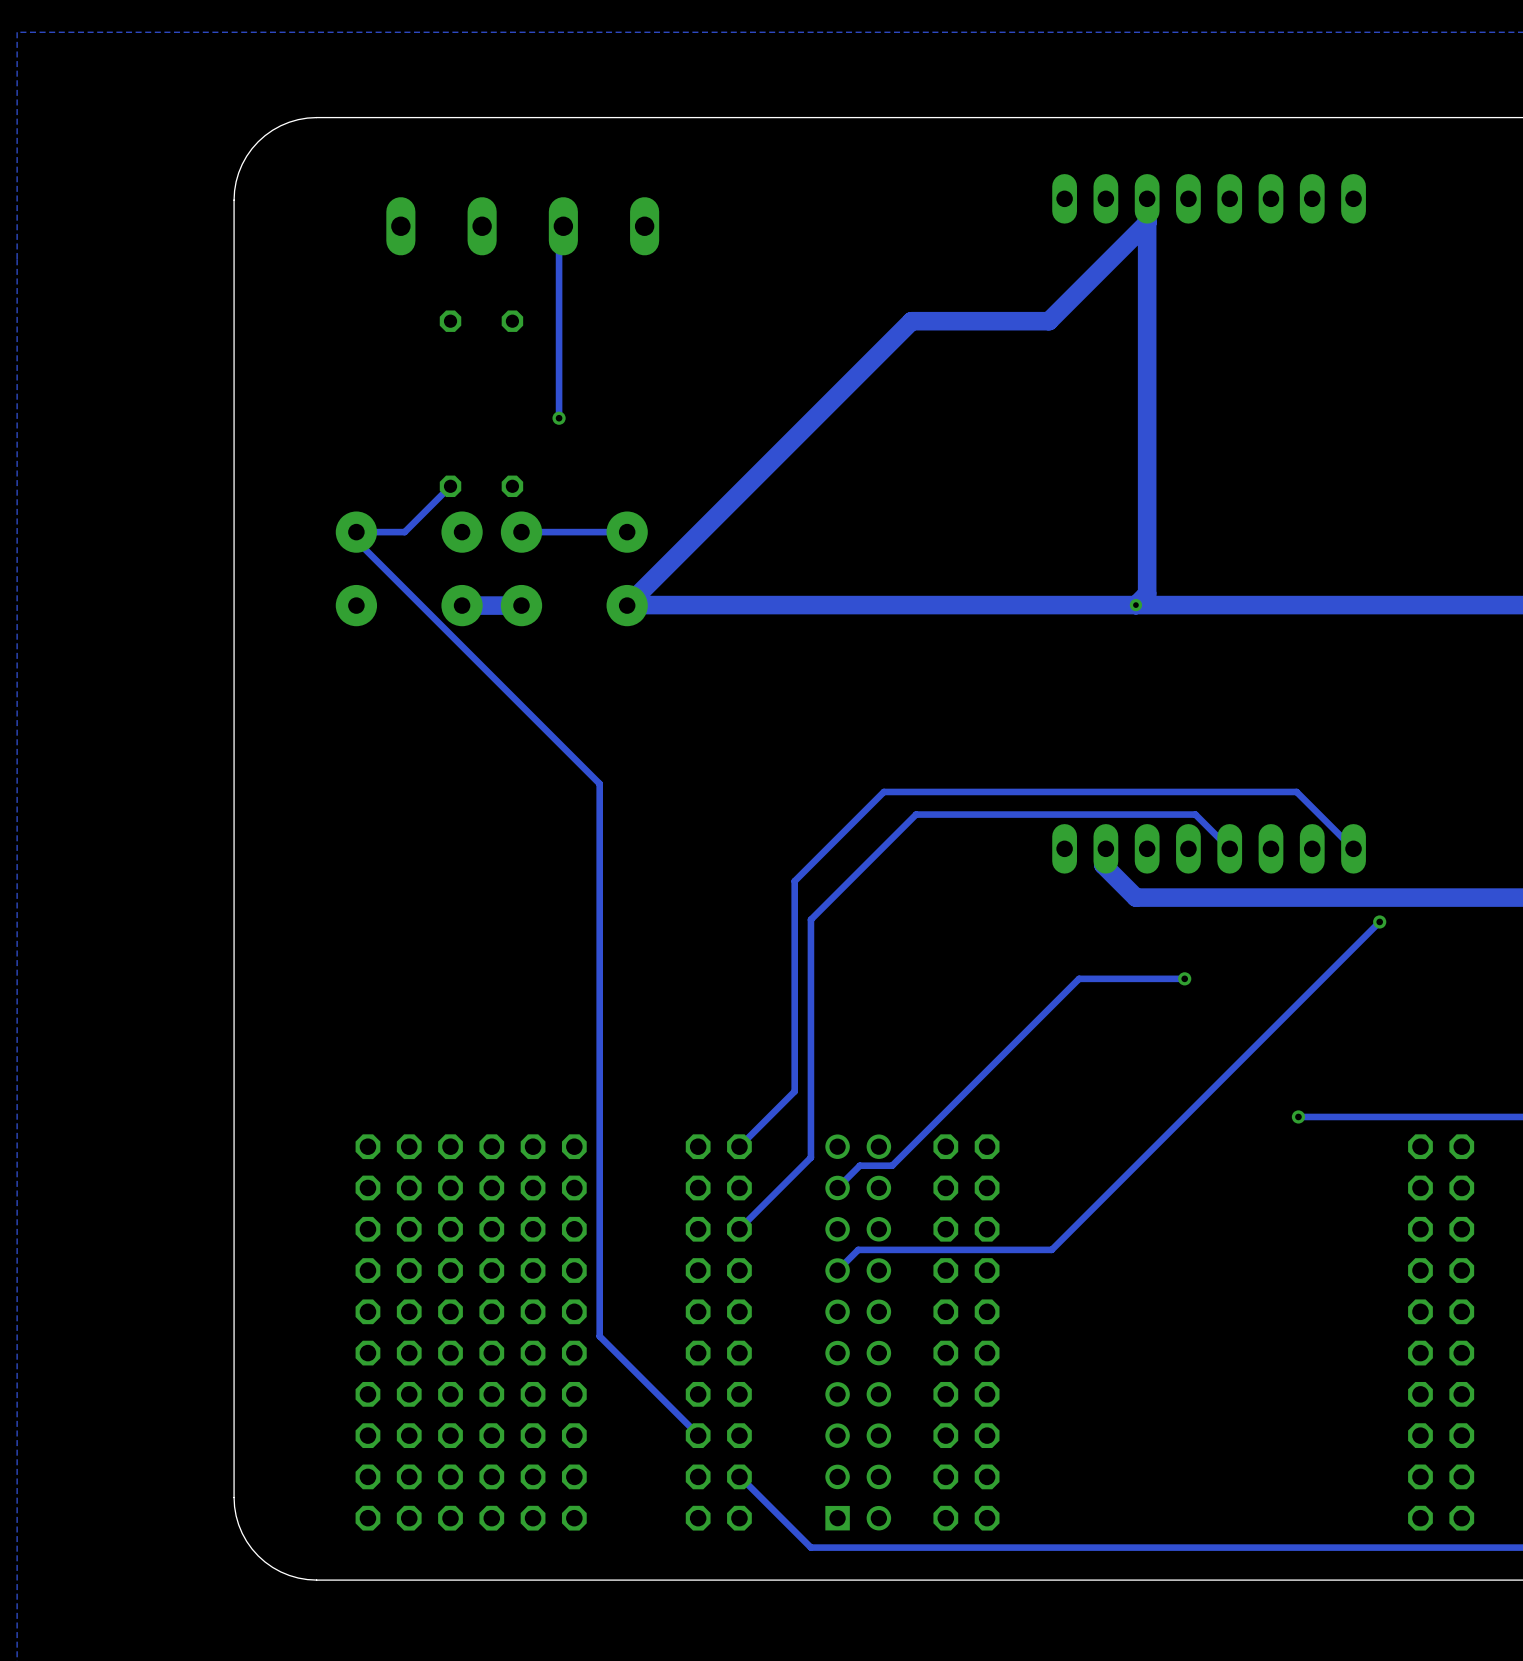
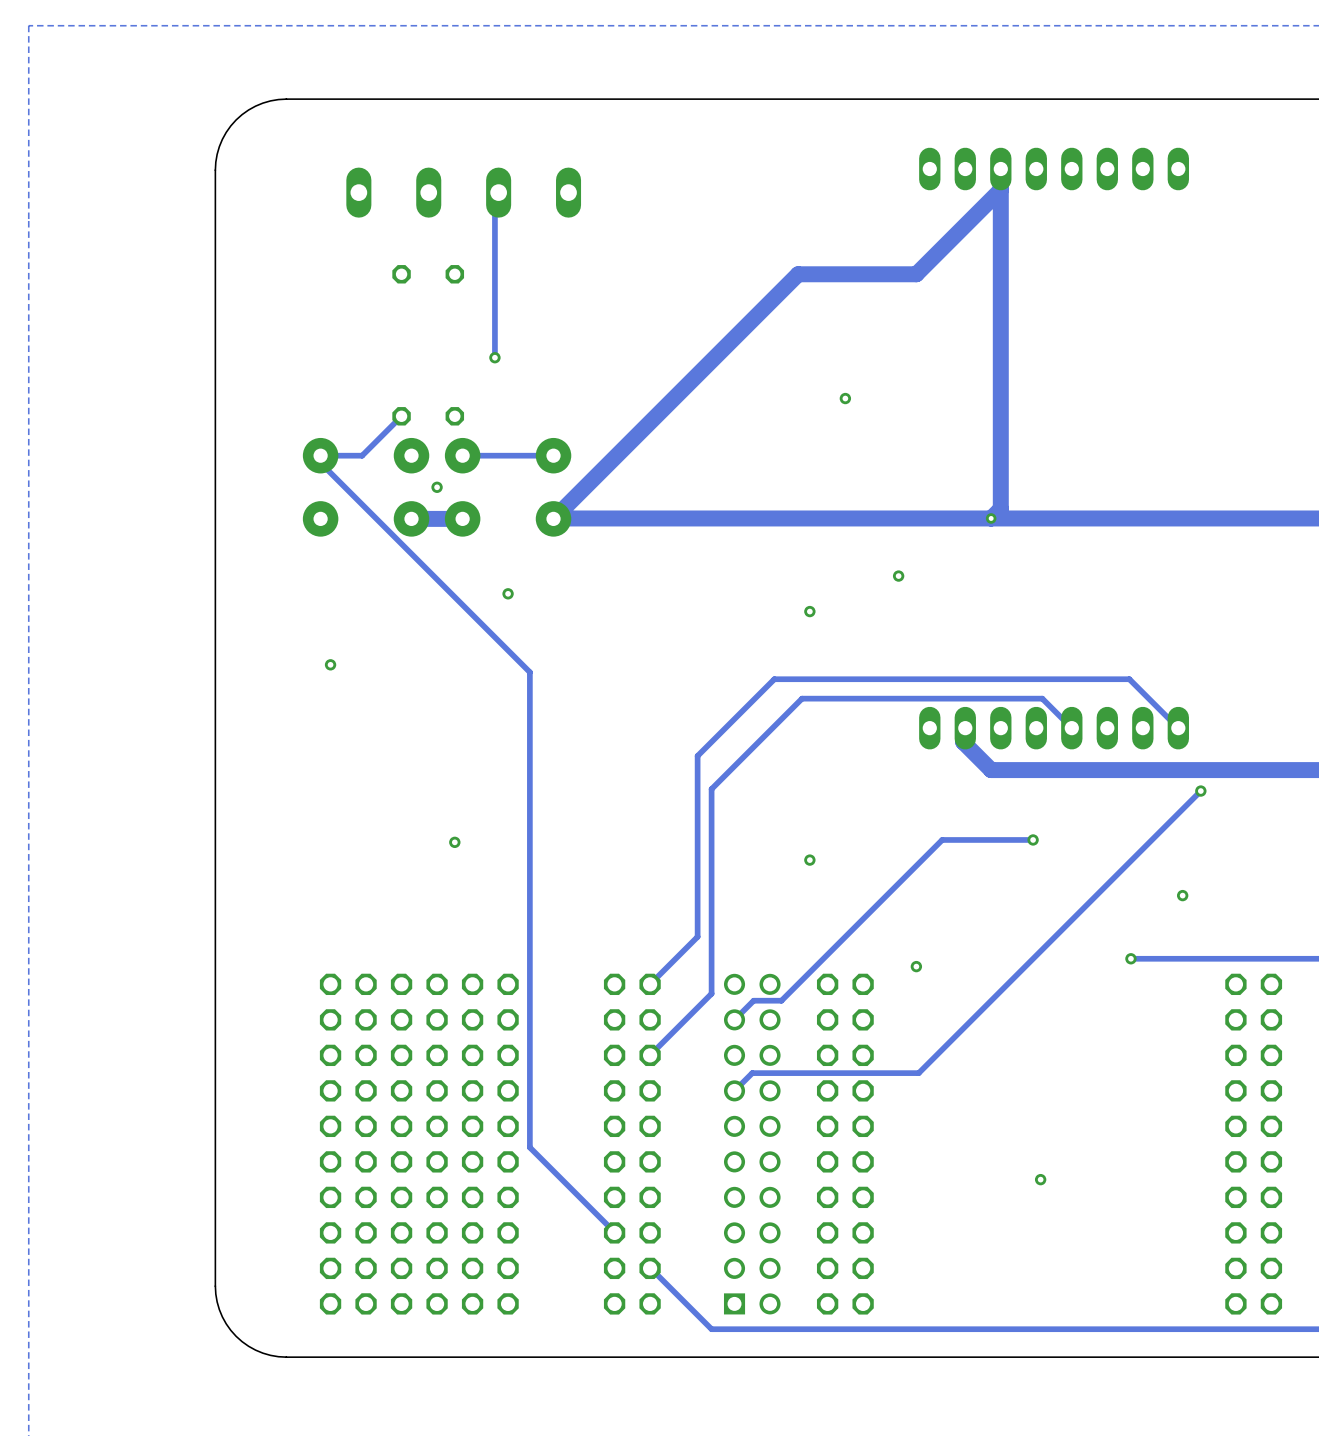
via: none -> (845, 398)
via: none -> (437, 487)
via: none -> (898, 576)
via: none -> (508, 593)
via: none -> (809, 611)
via: none -> (330, 664)
via: none -> (454, 842)
via: none -> (809, 860)
via: none -> (1182, 895)
via: none -> (916, 966)
via: none -> (1040, 1179)

